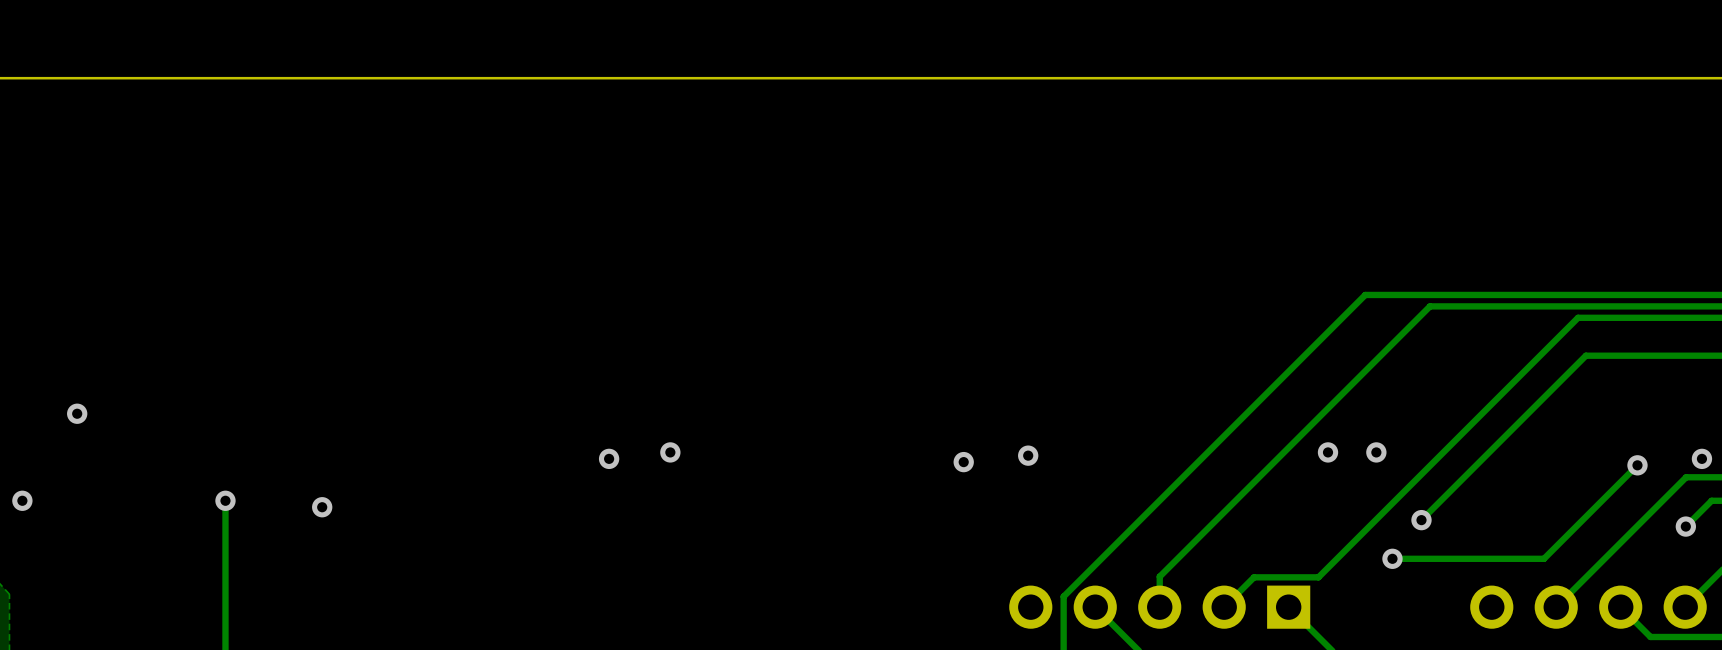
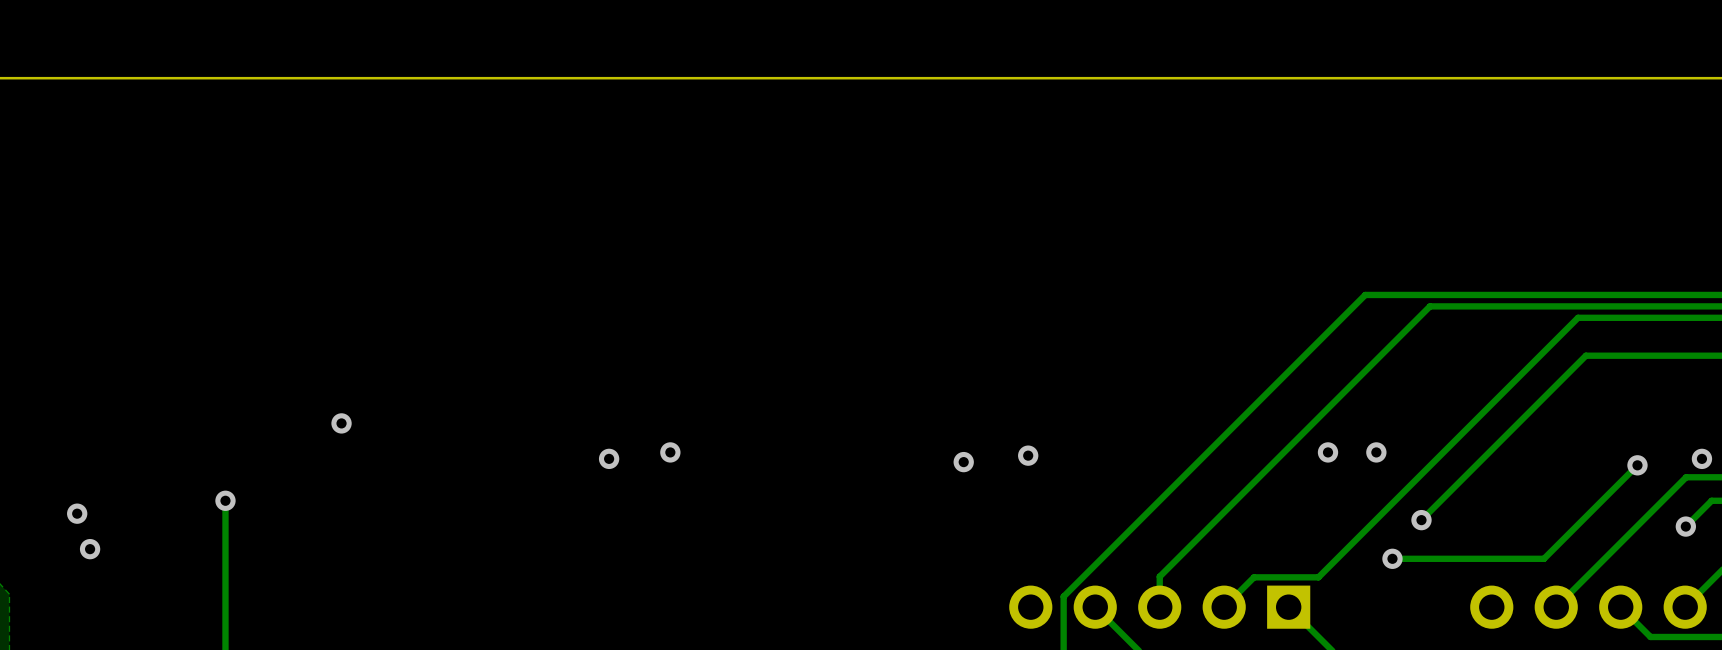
via: (77, 413) -> none
via: (22, 500) -> none
via position: (322, 507) -> (341, 423)
via: none -> (77, 513)
via: none -> (90, 549)

